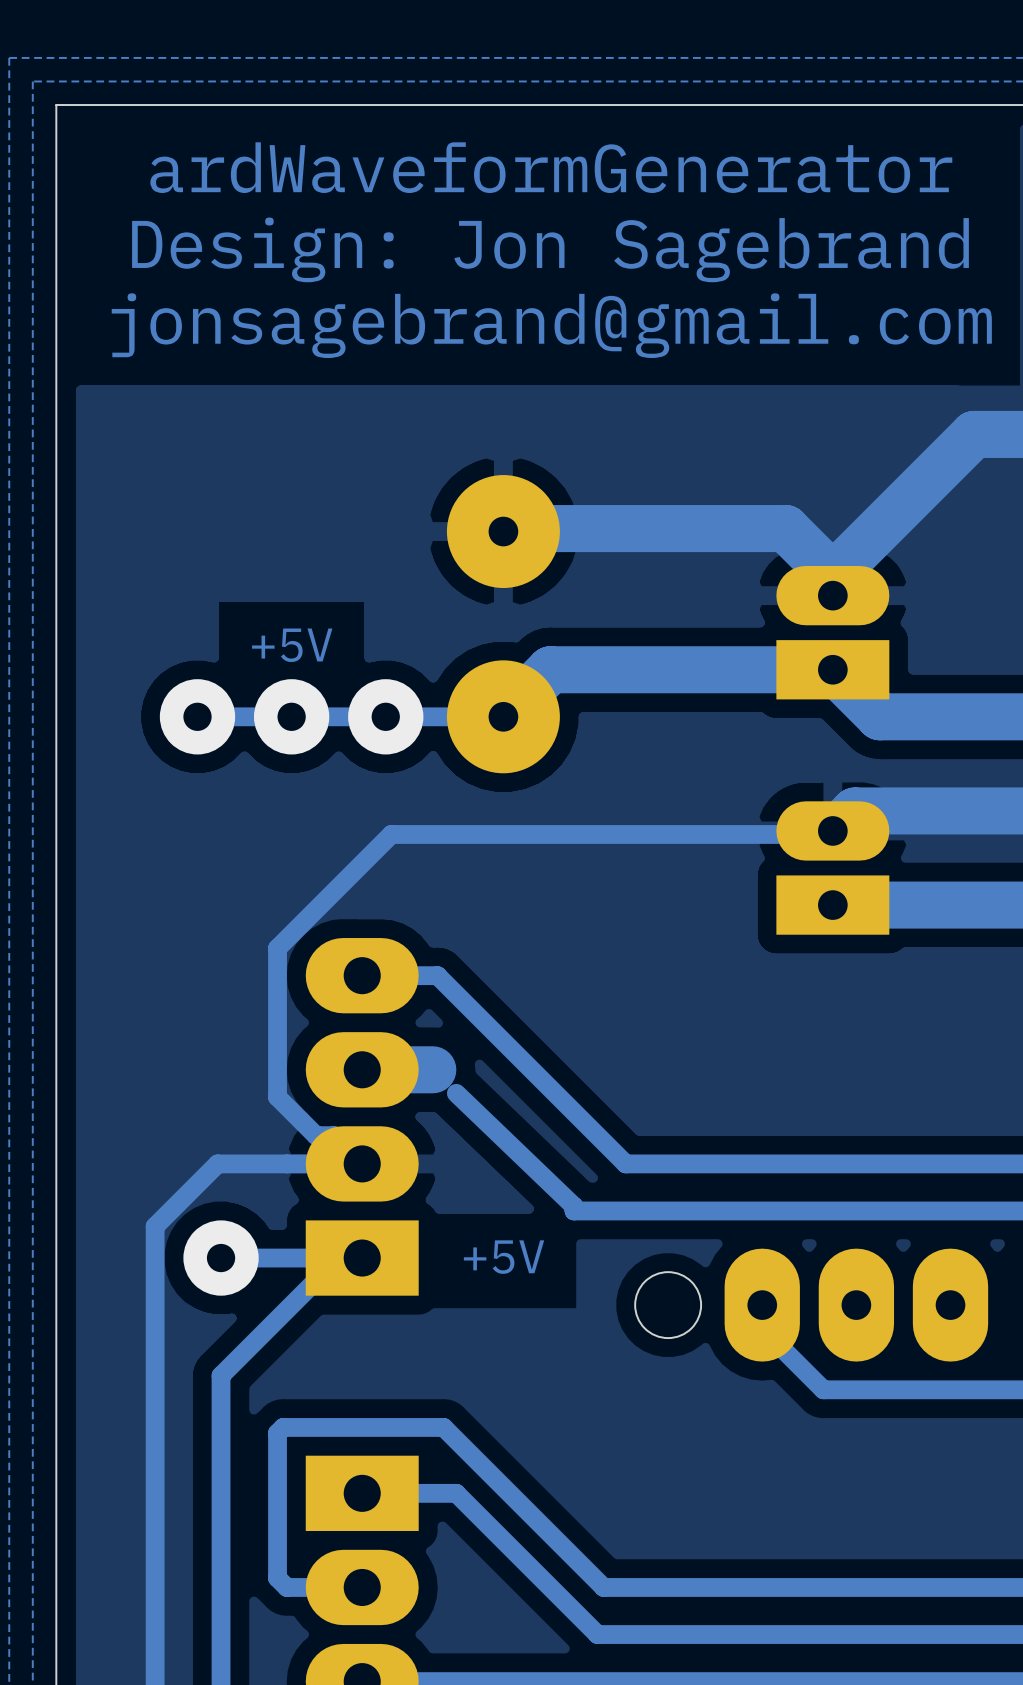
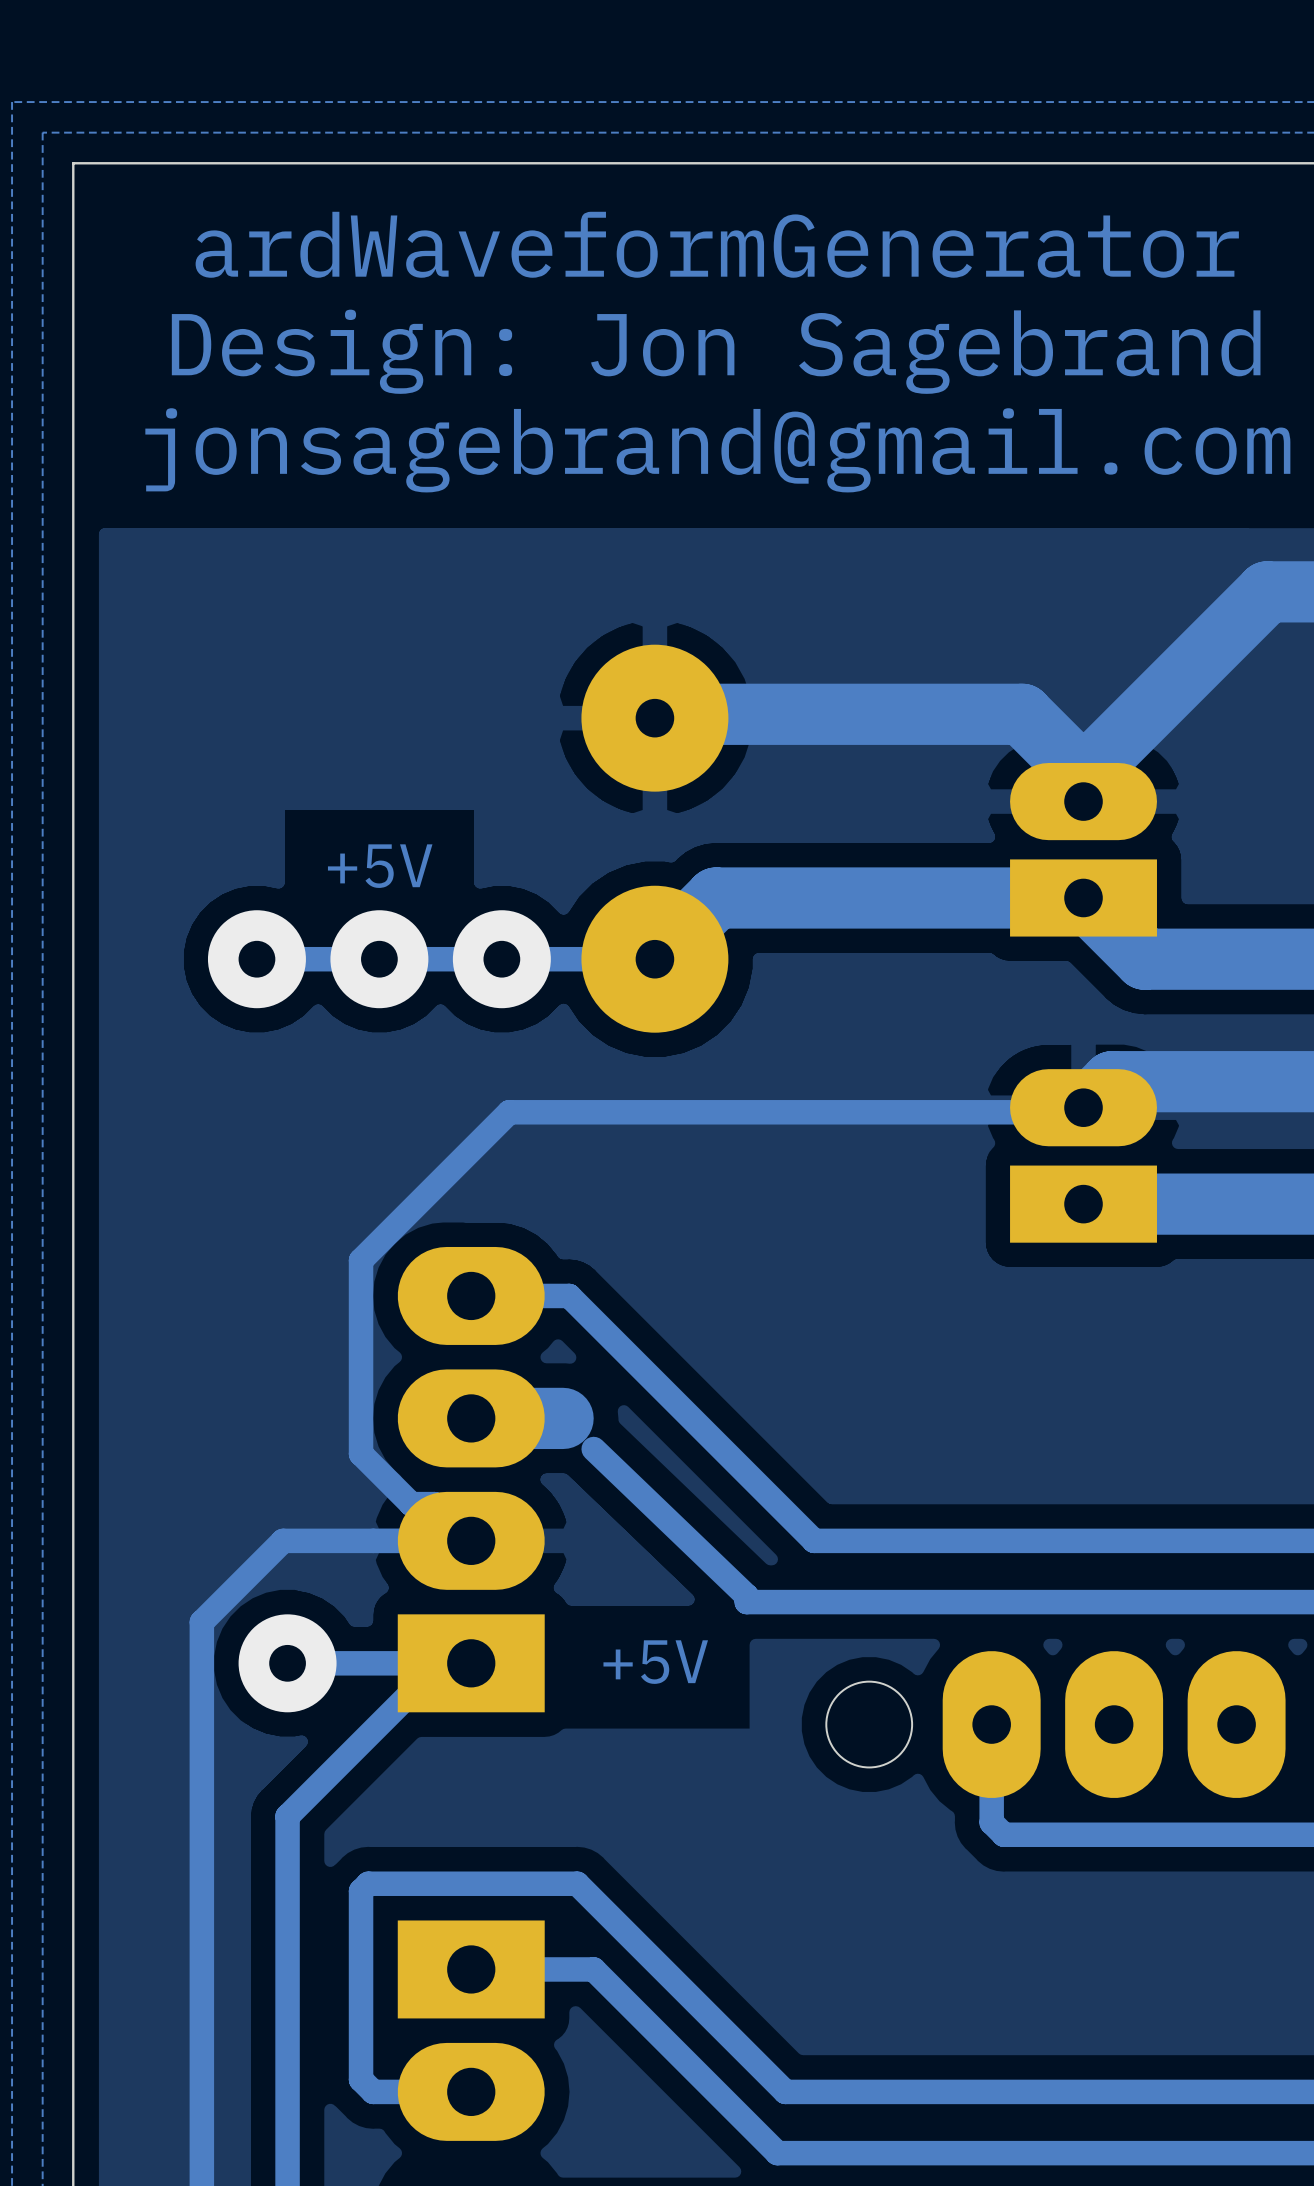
bottom track: (762, 1328) (823, 1389) -> (991, 1724) (991, 1822) (1003, 1834) (1071, 1834)

